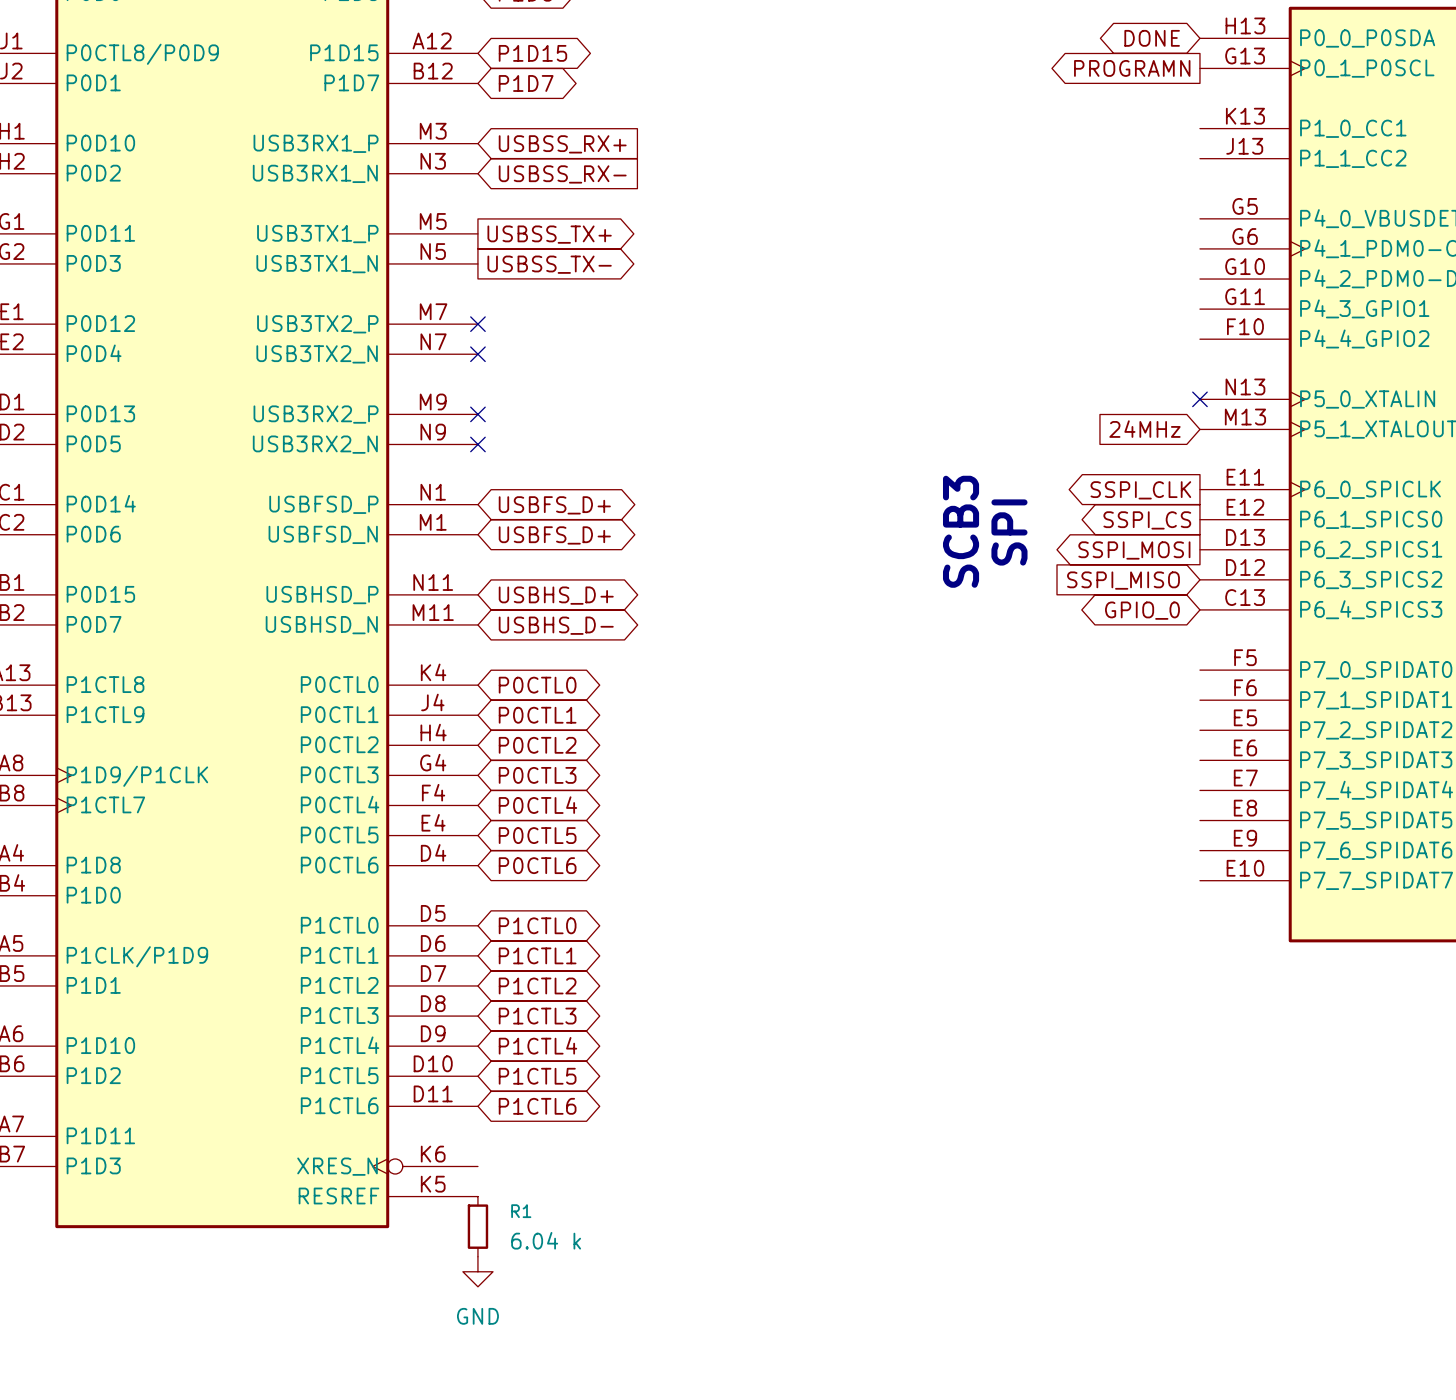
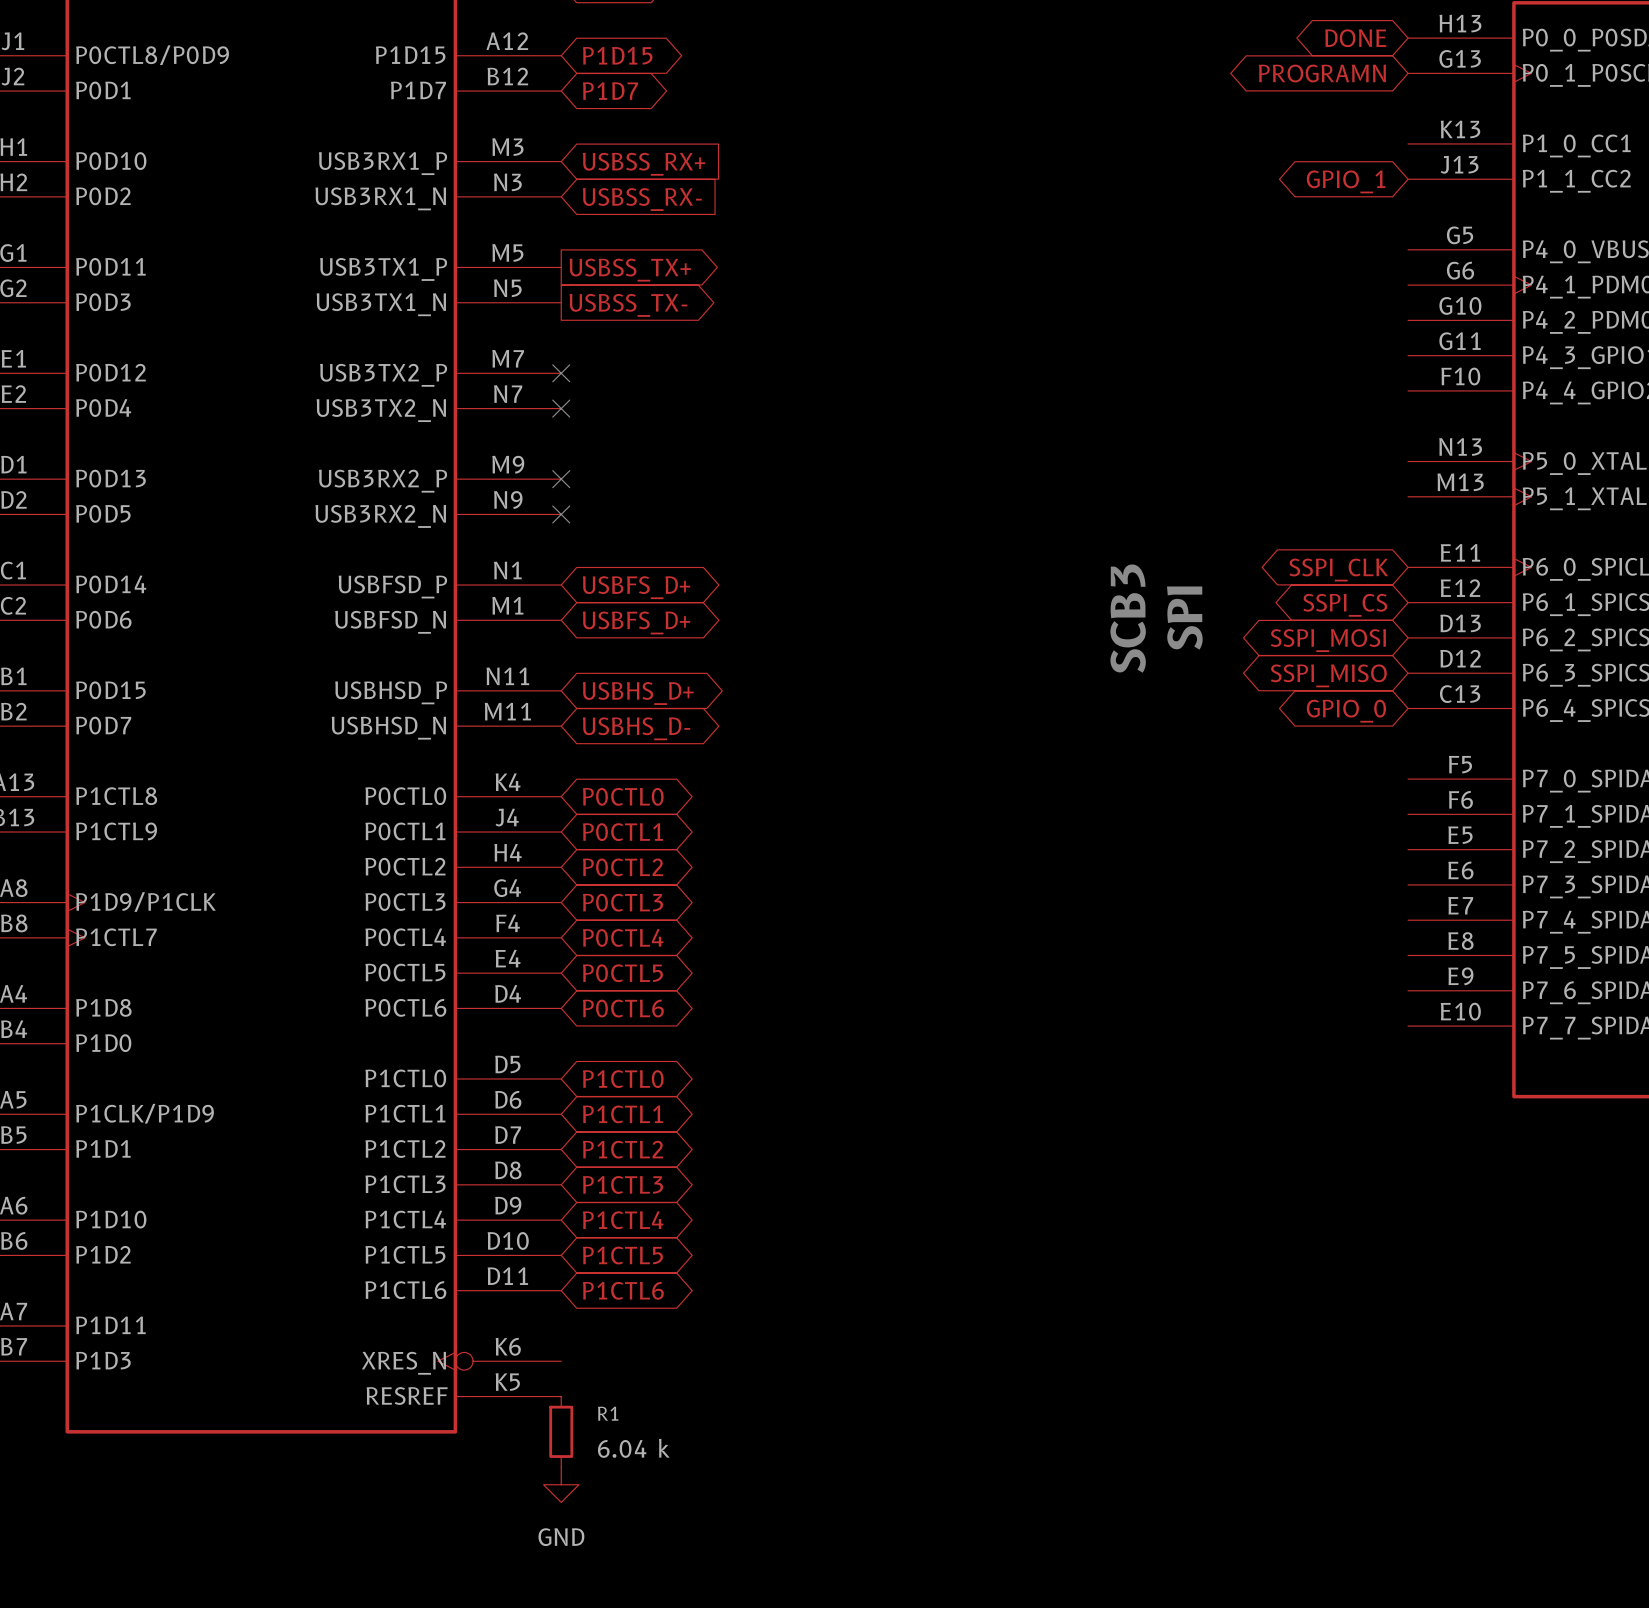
global label shape: output (1132, 68) -> bidirectional (1322, 73)
global label: none -> GPIO_1 (1346, 181)
no-connect mark: (1199, 399) -> none
global label: 24MHz (1144, 429) -> none
global label shape: output (1140, 490) -> bidirectional (1338, 570)
global label shape: output (1147, 520) -> bidirectional (1345, 605)
global label shape: output (1134, 550) -> bidirectional (1328, 640)
global label shape: input (1123, 580) -> bidirectional (1328, 675)

